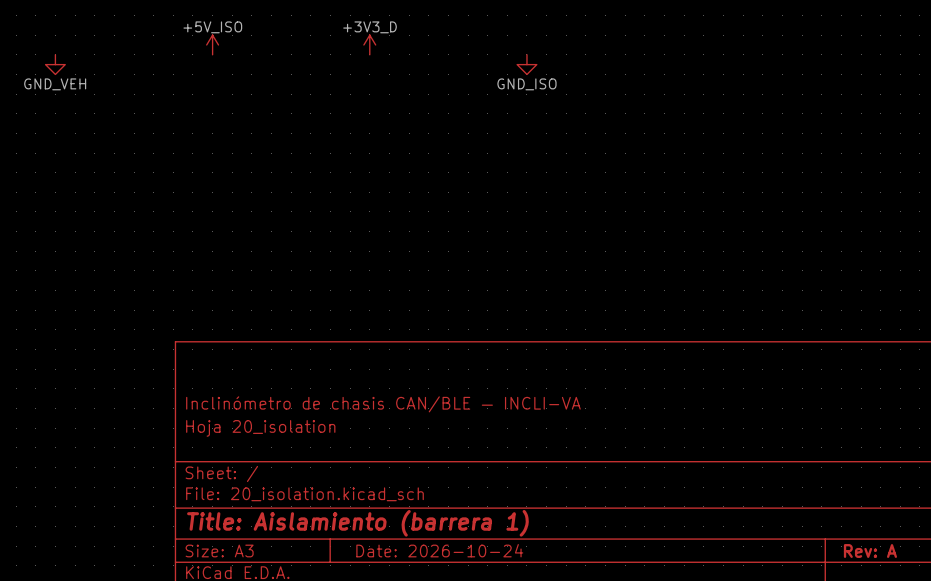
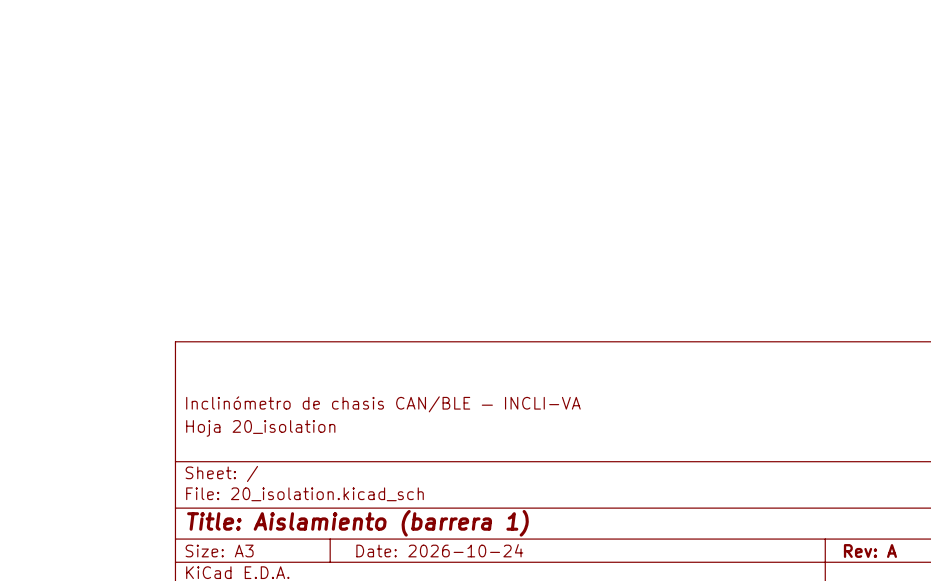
power symbol: +5V_ISO (212, 44) -> none
power symbol: +3V3_D (369, 44) -> none
power symbol: GND_VEH (55, 64) -> none
power symbol: GND_ISO (526, 64) -> none

